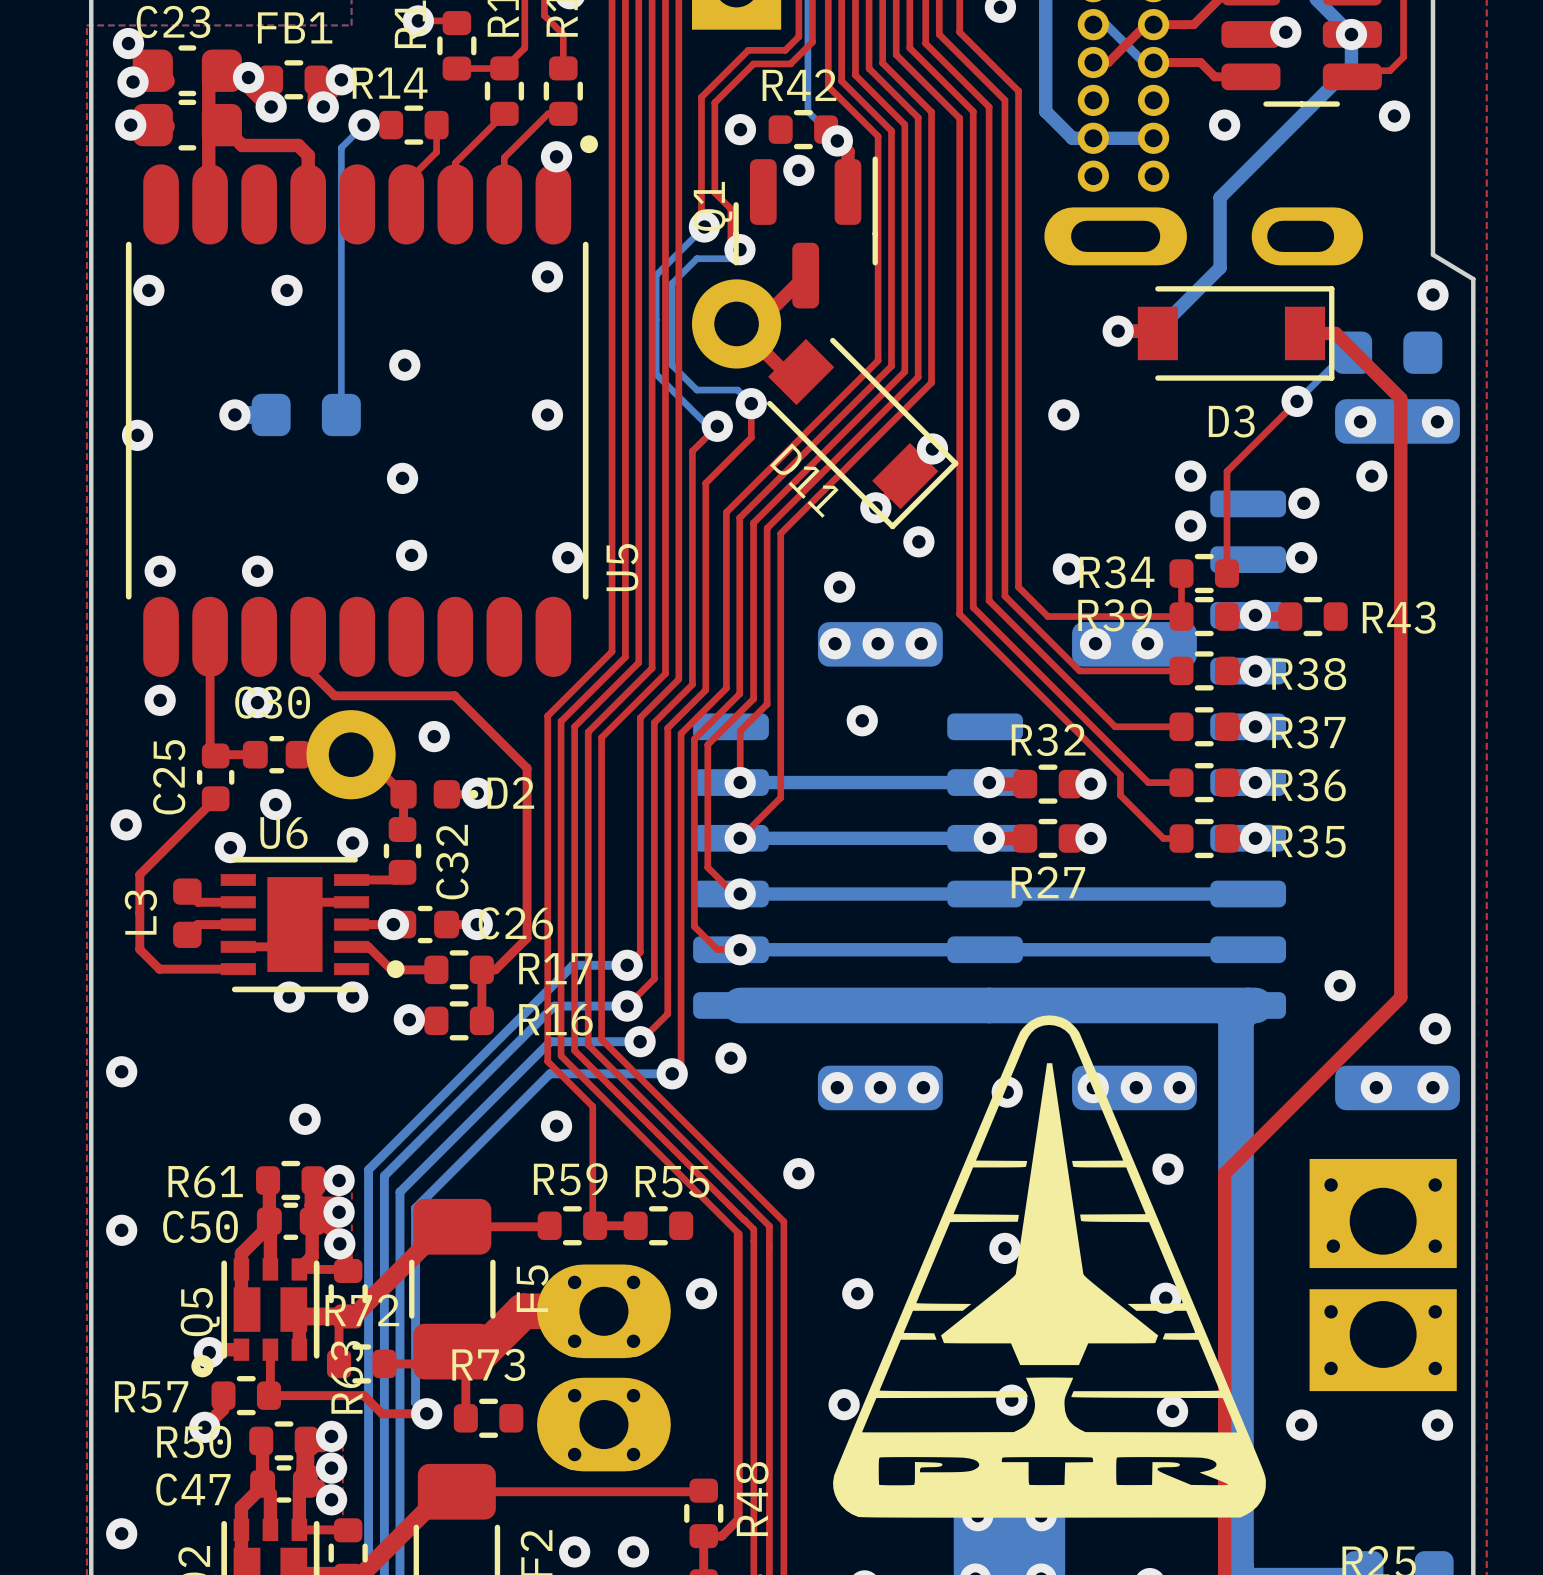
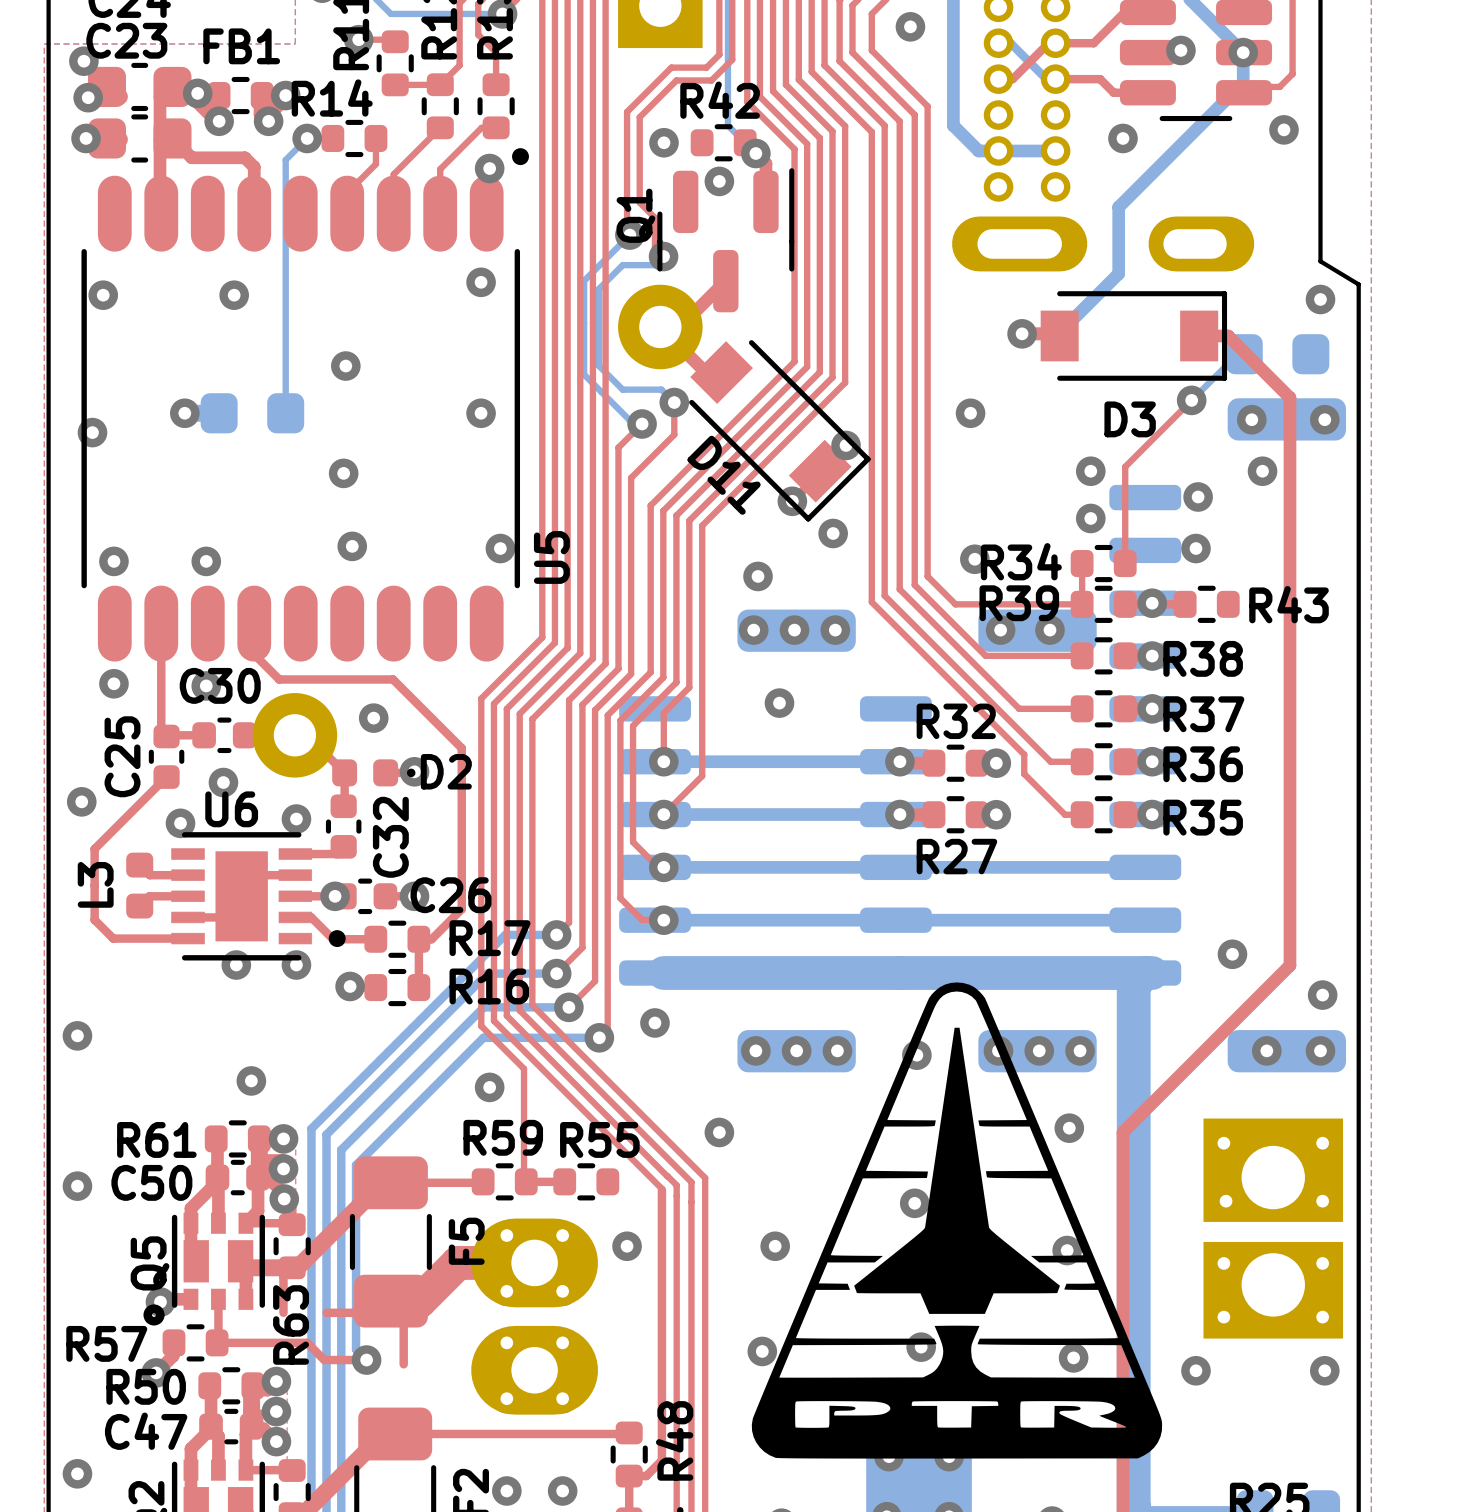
R72: (361, 1363) -> none
R73: (488, 1418) -> none

